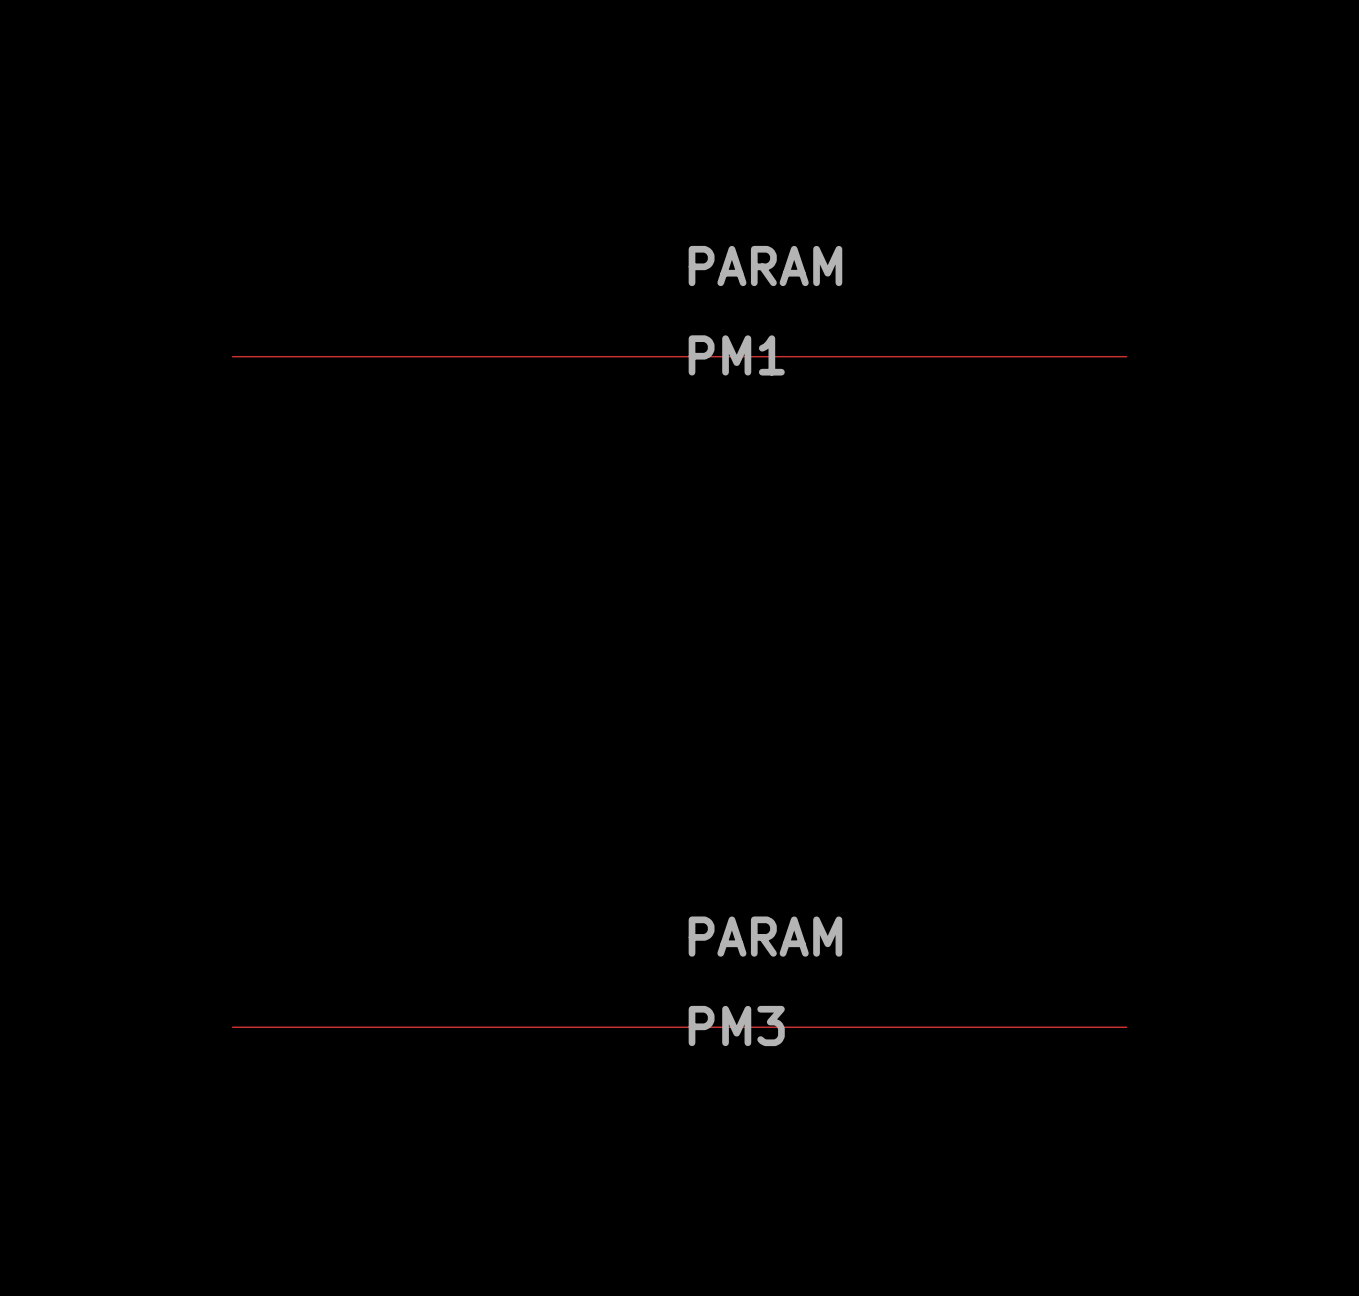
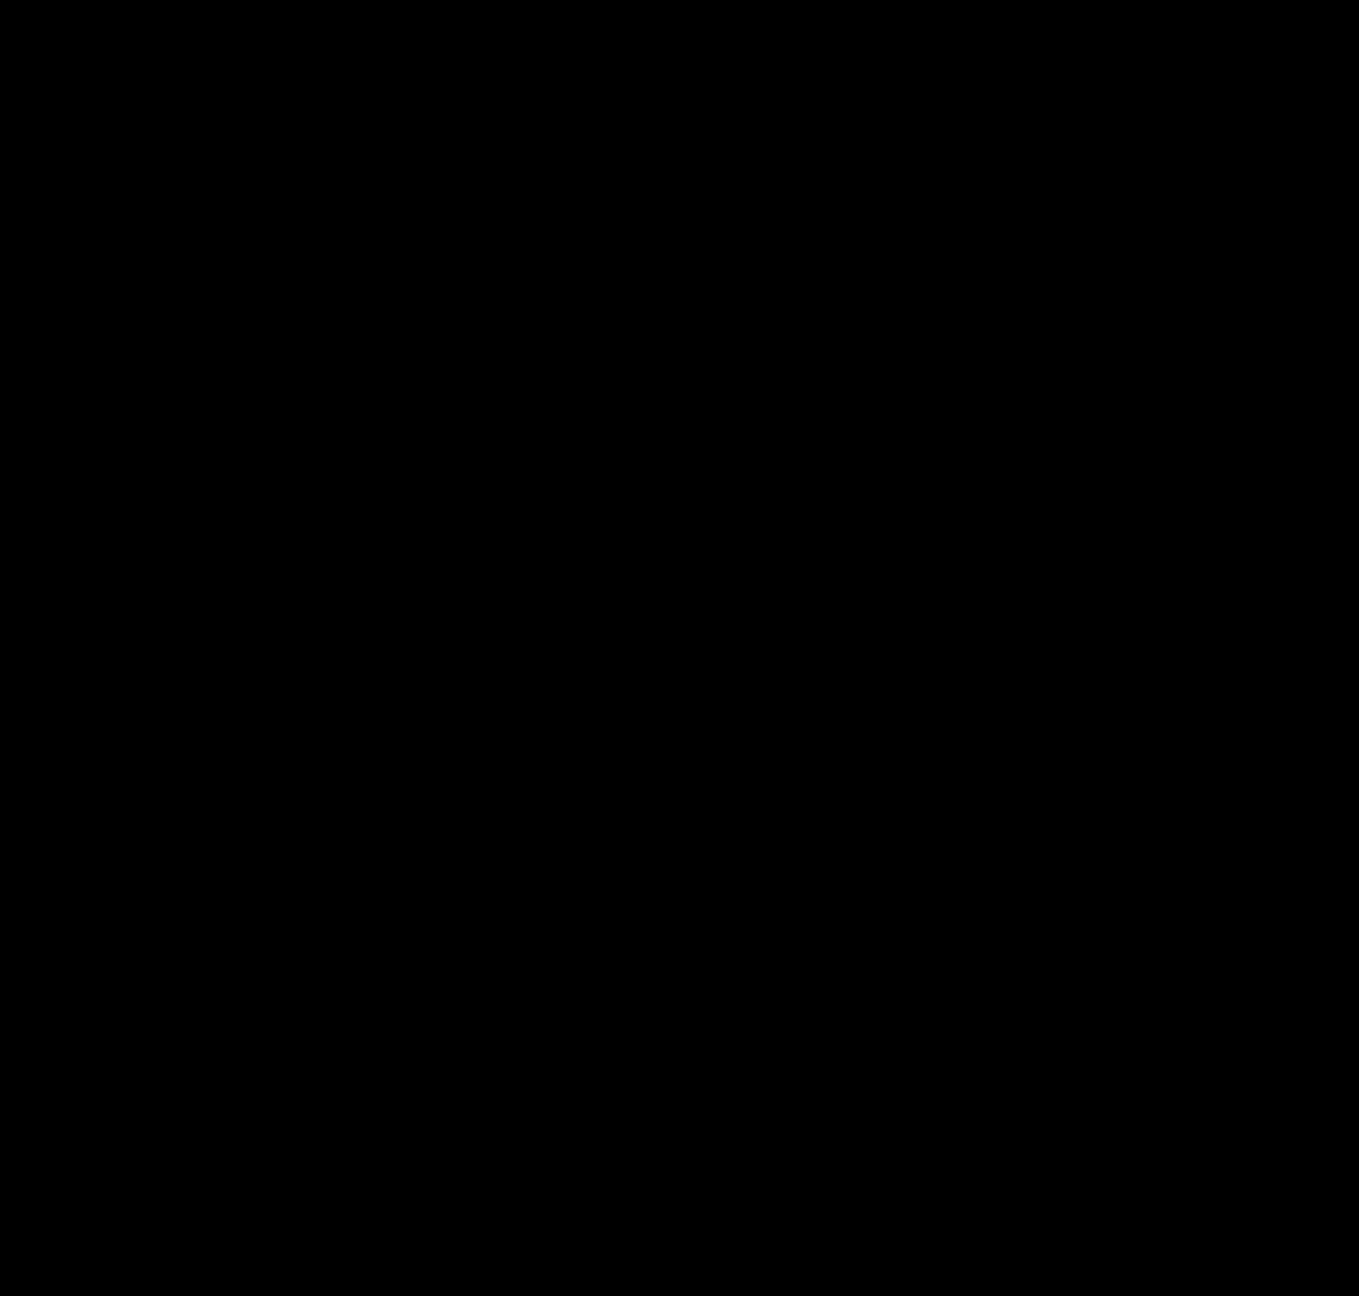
PM1: PARAM (679, 356) -> none
PM3: PARAM (679, 1027) -> none

